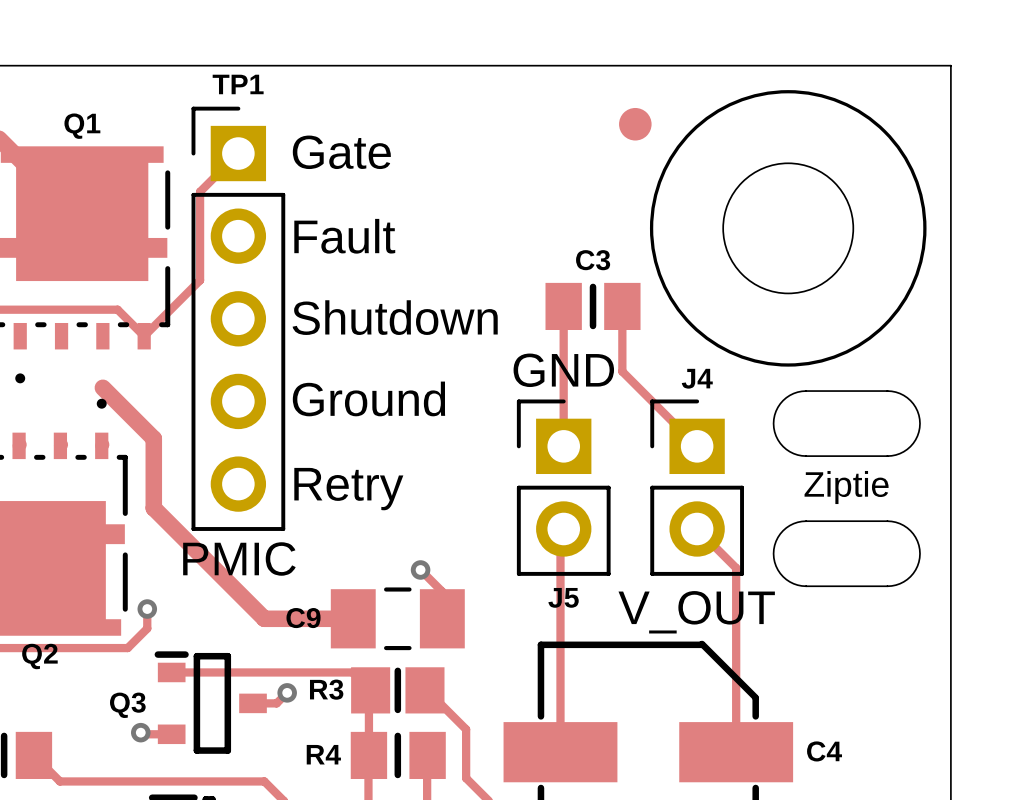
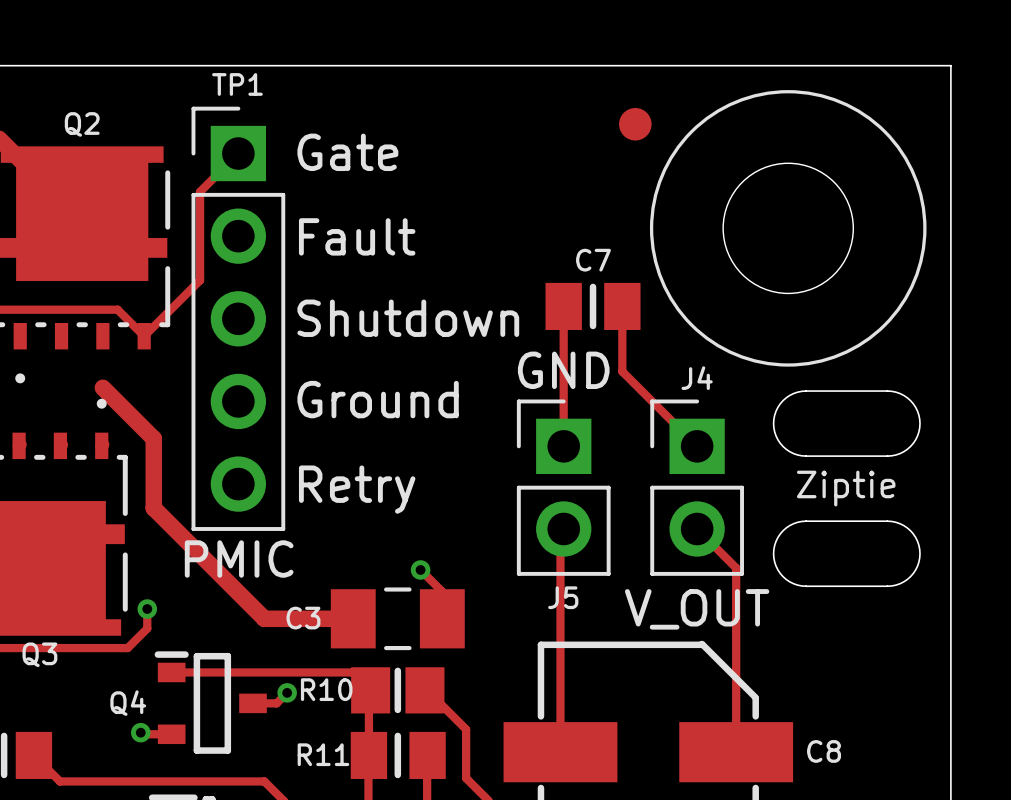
Q1 name: Q1 (82, 126) -> Q2 (82, 124)
C3 name: C3 (593, 260) -> C7 (593, 260)
C9 name: C9 (303, 618) -> C3 (303, 618)
Q2 name: Q2 (39, 656) -> Q3 (39, 654)
R3 name: R3 (326, 689) -> R10 (326, 689)
Q3 name: Q3 (127, 705) -> Q4 (128, 703)
C4 name: C4 (824, 751) -> C8 (824, 751)
R4 name: R4 (323, 754) -> R11 (323, 754)

